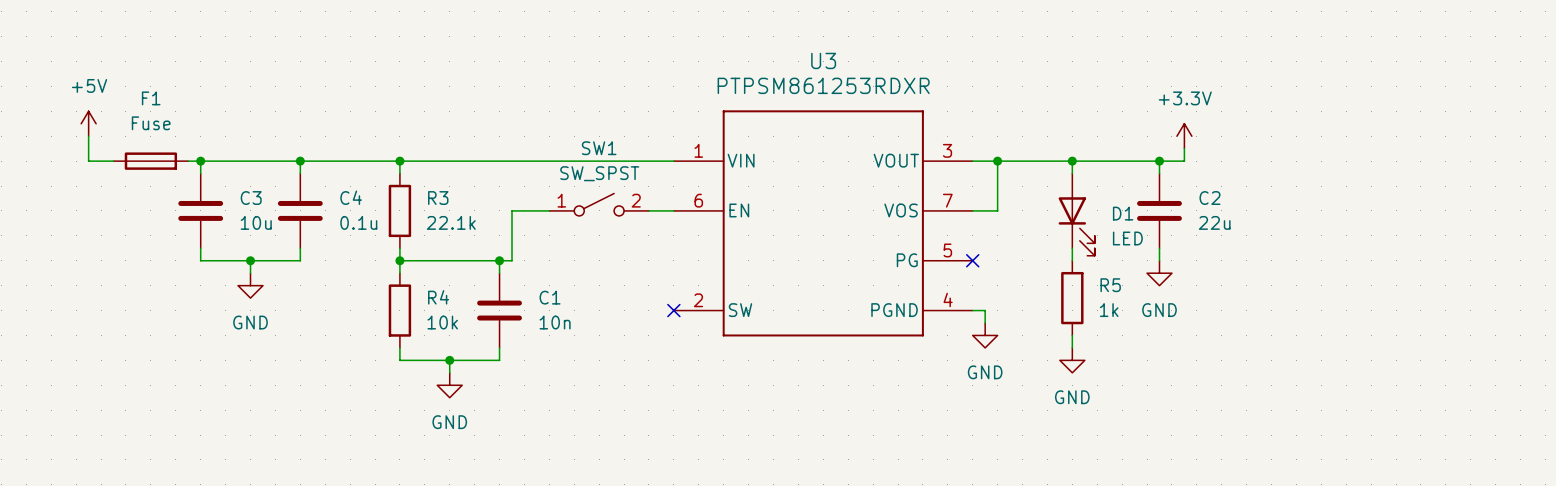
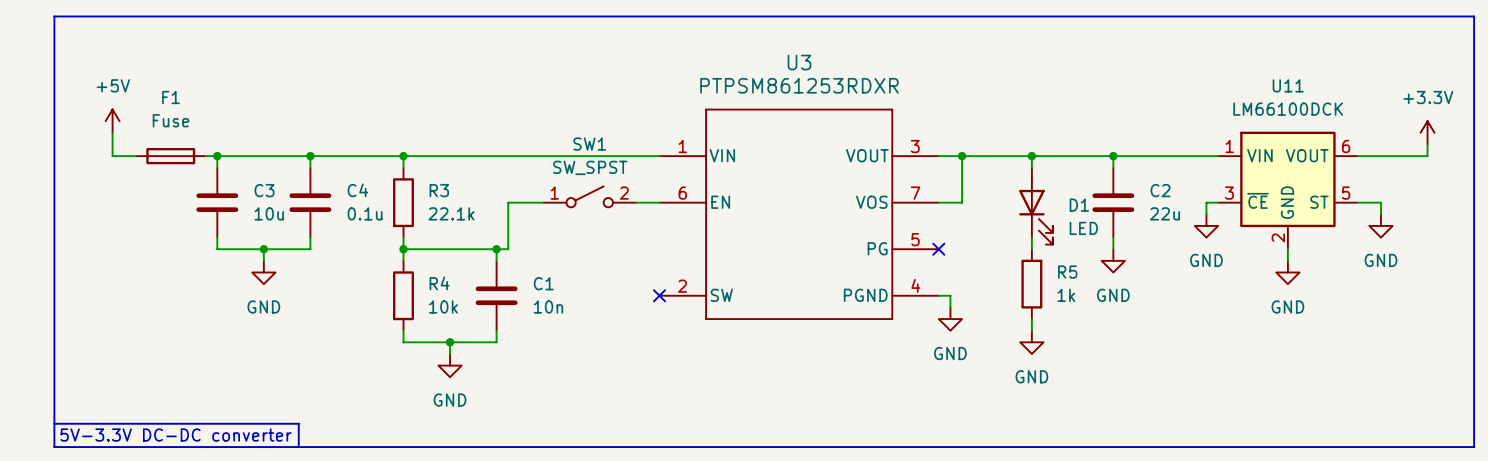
line: none -> (54, 16) (1474, 16) (1474, 447) (54, 447) (54, 16)
power symbol: +3.3V (1184, 136) -> none
power symbol: none -> +3.3V (1427, 132)
wire: (1184, 148) (1184, 161) -> (1218, 156) (1136, 156)
wire: none -> (1427, 144) (1427, 156) (1357, 156)
U11: none -> LM66100DCK (1287, 190)
wire: none -> (1218, 202) (1206, 202) (1206, 214)
wire: none -> (1357, 202) (1381, 202) (1381, 214)
power symbol: none -> GND (1206, 225)
power symbol: none -> GND (1381, 225)
wire: none -> (1287, 249) (1287, 260)
power symbol: none -> GND (1287, 272)
line: none -> (54, 423) (298, 423) (298, 447)
text: none -> 5V-3.3V DC-DC converter (175, 435)

